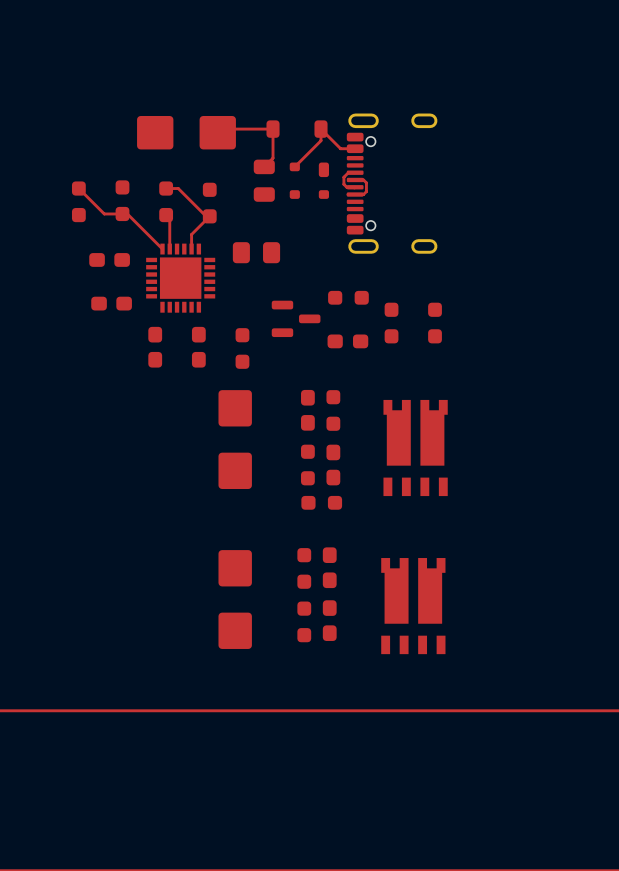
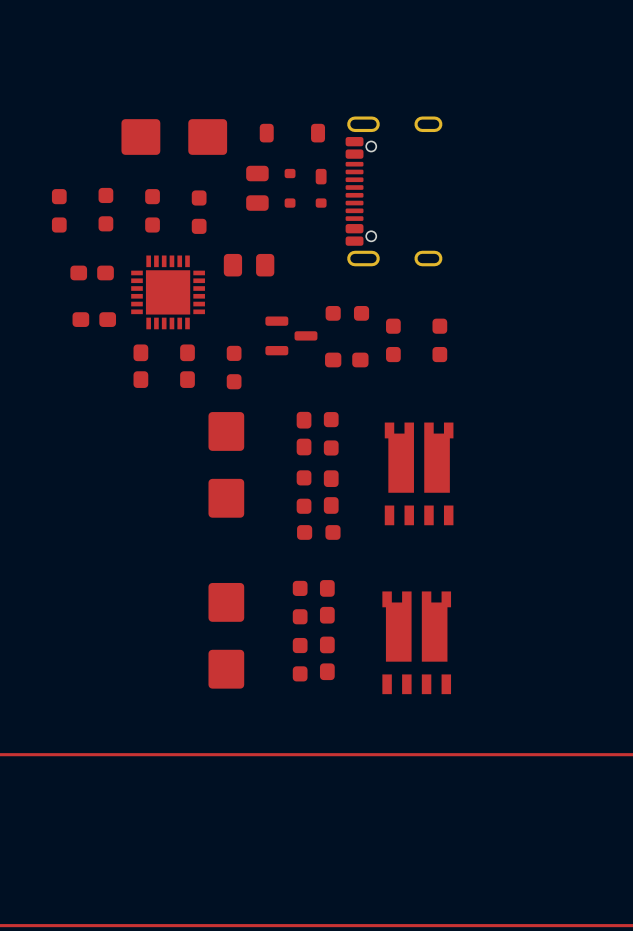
top track: (217, 132) (221, 129) (273, 129) (273, 158) (264, 166) -> none
top track: (355, 148) (340, 148) (321, 129) (321, 140) (294, 166) -> none
top track: (355, 172) (348, 172) (343, 177) (343, 184) (346, 187) (354, 187) -> none
top track: (355, 179) (363, 179) (366, 182) (366, 191) (363, 194) (347, 194) -> none
top track: (78, 188) (104, 213) (127, 213) (162, 249) -> none
top track: (166, 188) (178, 188) (206, 216) (209, 216) (191, 234) (191, 249) -> none
top track: (166, 215) (169, 218) (169, 249) -> none

